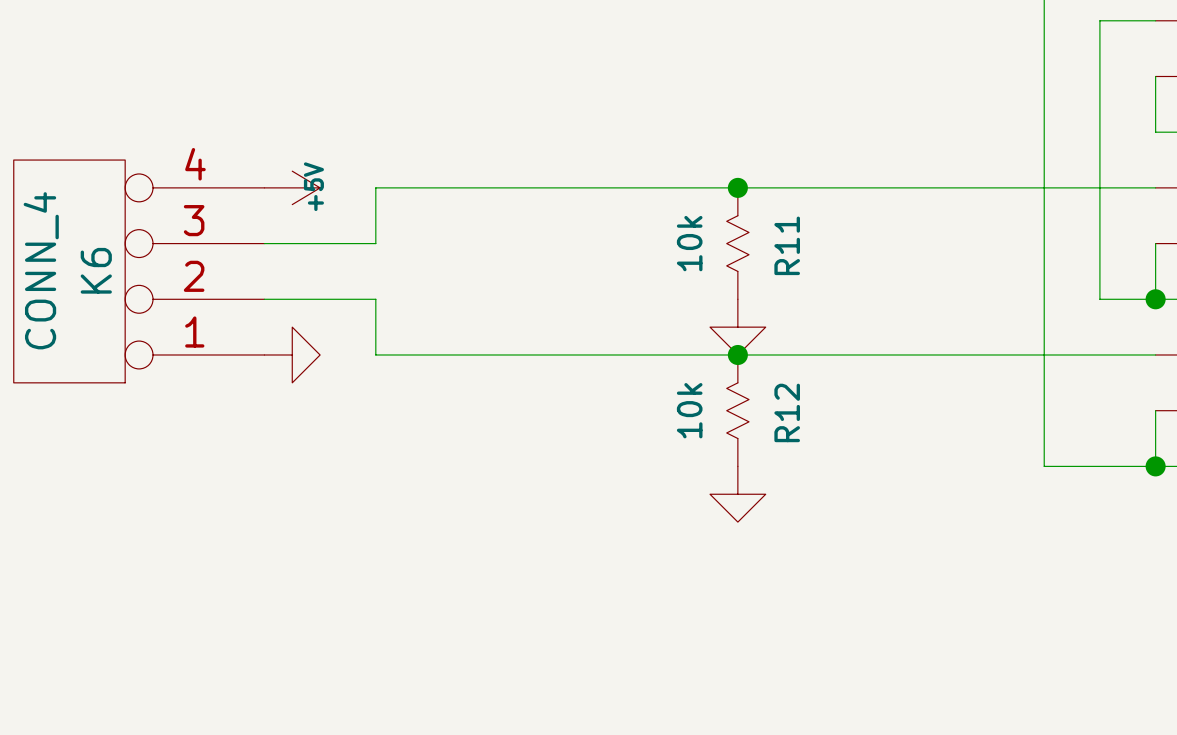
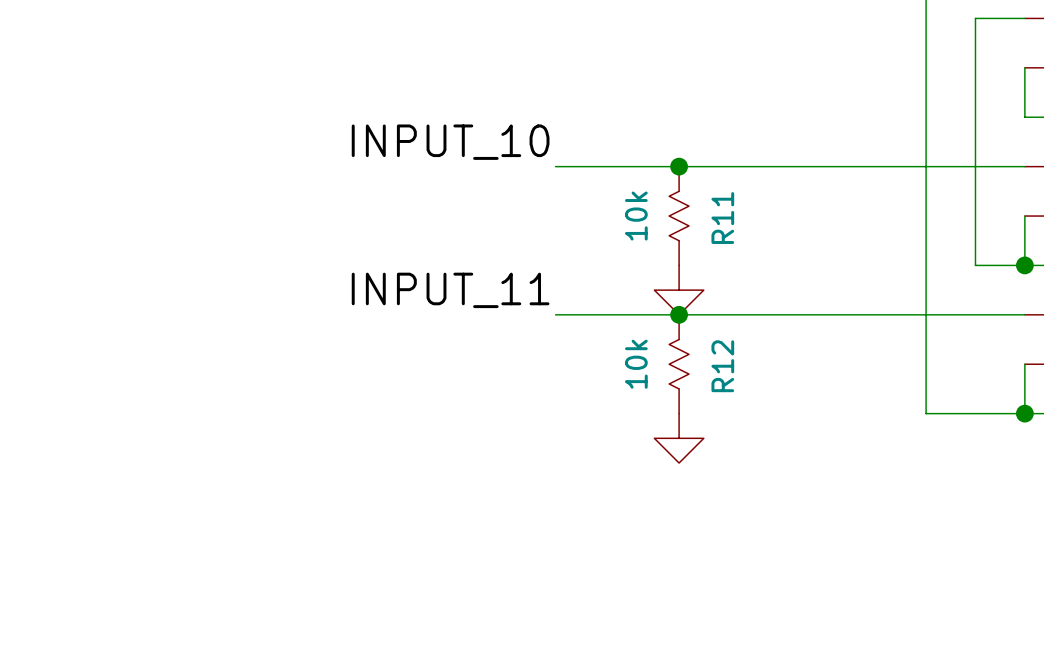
label: none -> INPUT_10 (450, 142)
power symbol: +5V (292, 187) -> none
wire: (626, 187) (375, 187) (375, 243) (264, 243) -> none
junction position: (737, 187) -> (679, 166)
R11 position: (737, 243) -> (679, 216)
K6: CONN_4 (139, 271) -> none
wire: (264, 299) (375, 299) (375, 354) (626, 354) -> none
label: none -> INPUT_11 (450, 290)
power symbol position: (737, 327) -> (679, 290)
power symbol: (292, 354) -> none
junction position: (737, 354) -> (679, 314)
R12 position: (737, 410) -> (679, 364)
power symbol position: (737, 494) -> (679, 438)

